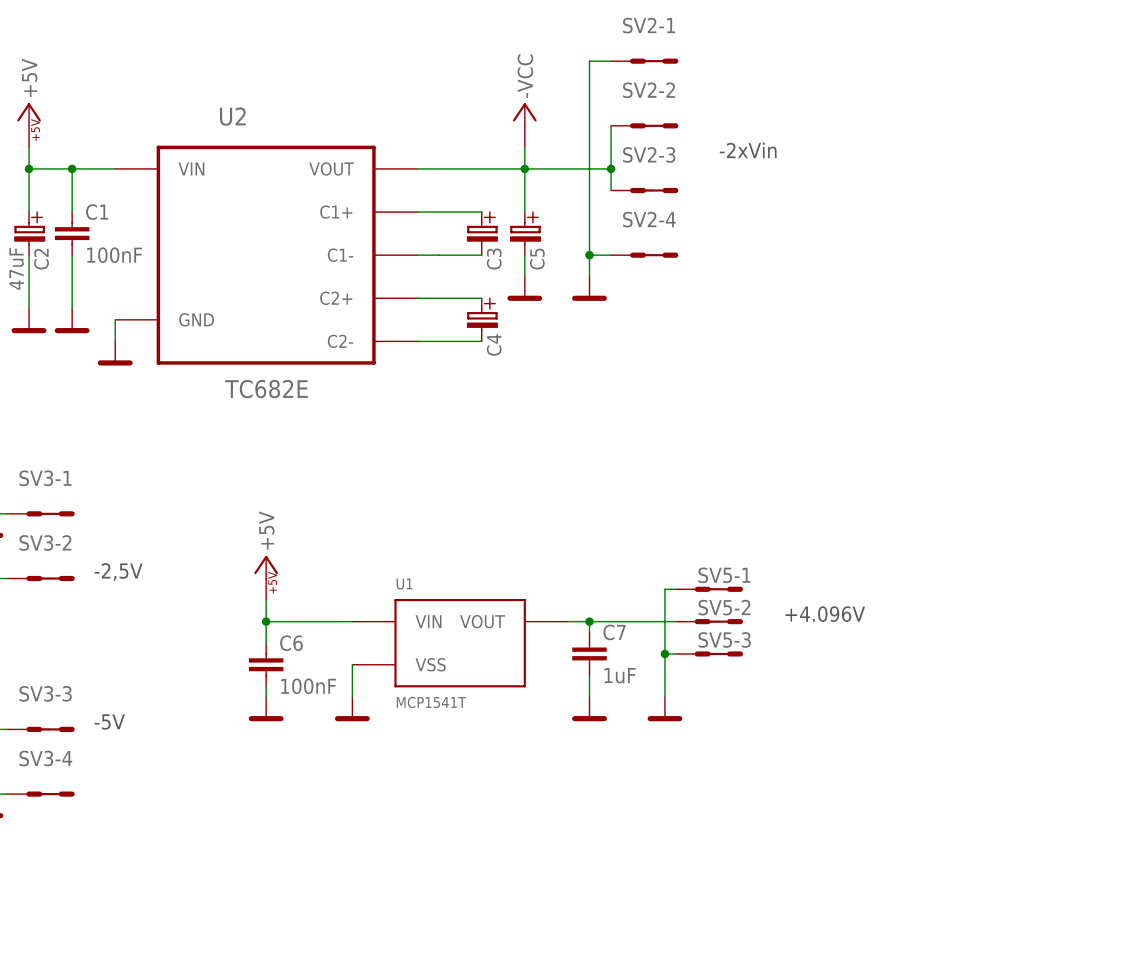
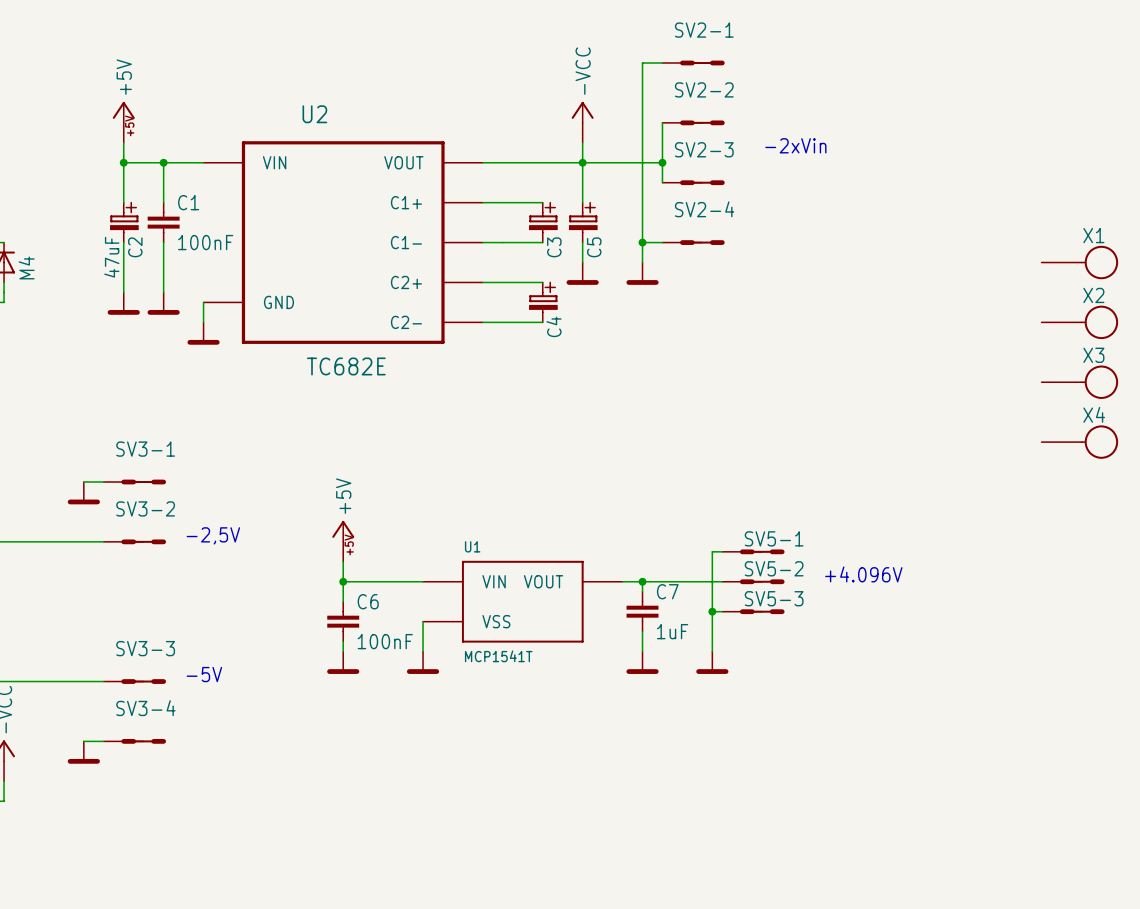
X1: none -> (1079, 262)
X2: none -> (1079, 322)
X3: none -> (1079, 382)
X4: none -> (1079, 442)

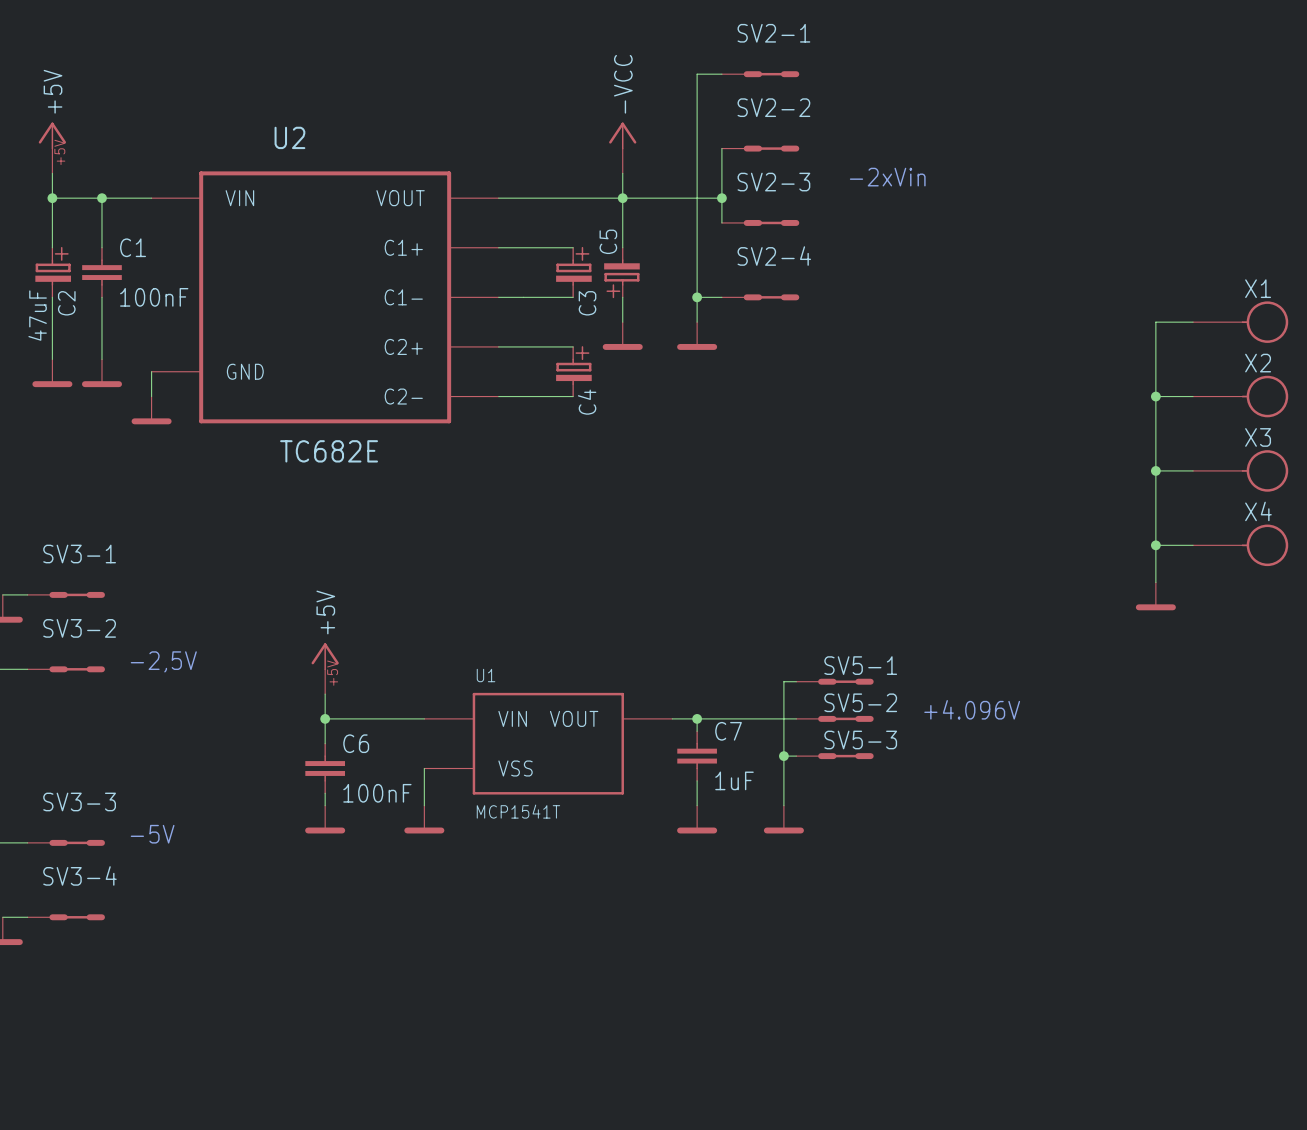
C5 rotation: 0° (583, 222) -> 180° (621, 272)
wire: none -> (1193, 322) (1155, 322) (1155, 582)
wire: none -> (1155, 396) (1193, 396)
junction: none -> (1155, 396)
wire: none -> (1155, 470) (1193, 470)
junction: none -> (1155, 470)
wire: none -> (1155, 545) (1193, 545)
junction: none -> (1155, 545)
power symbol: none -> (1155, 596)

